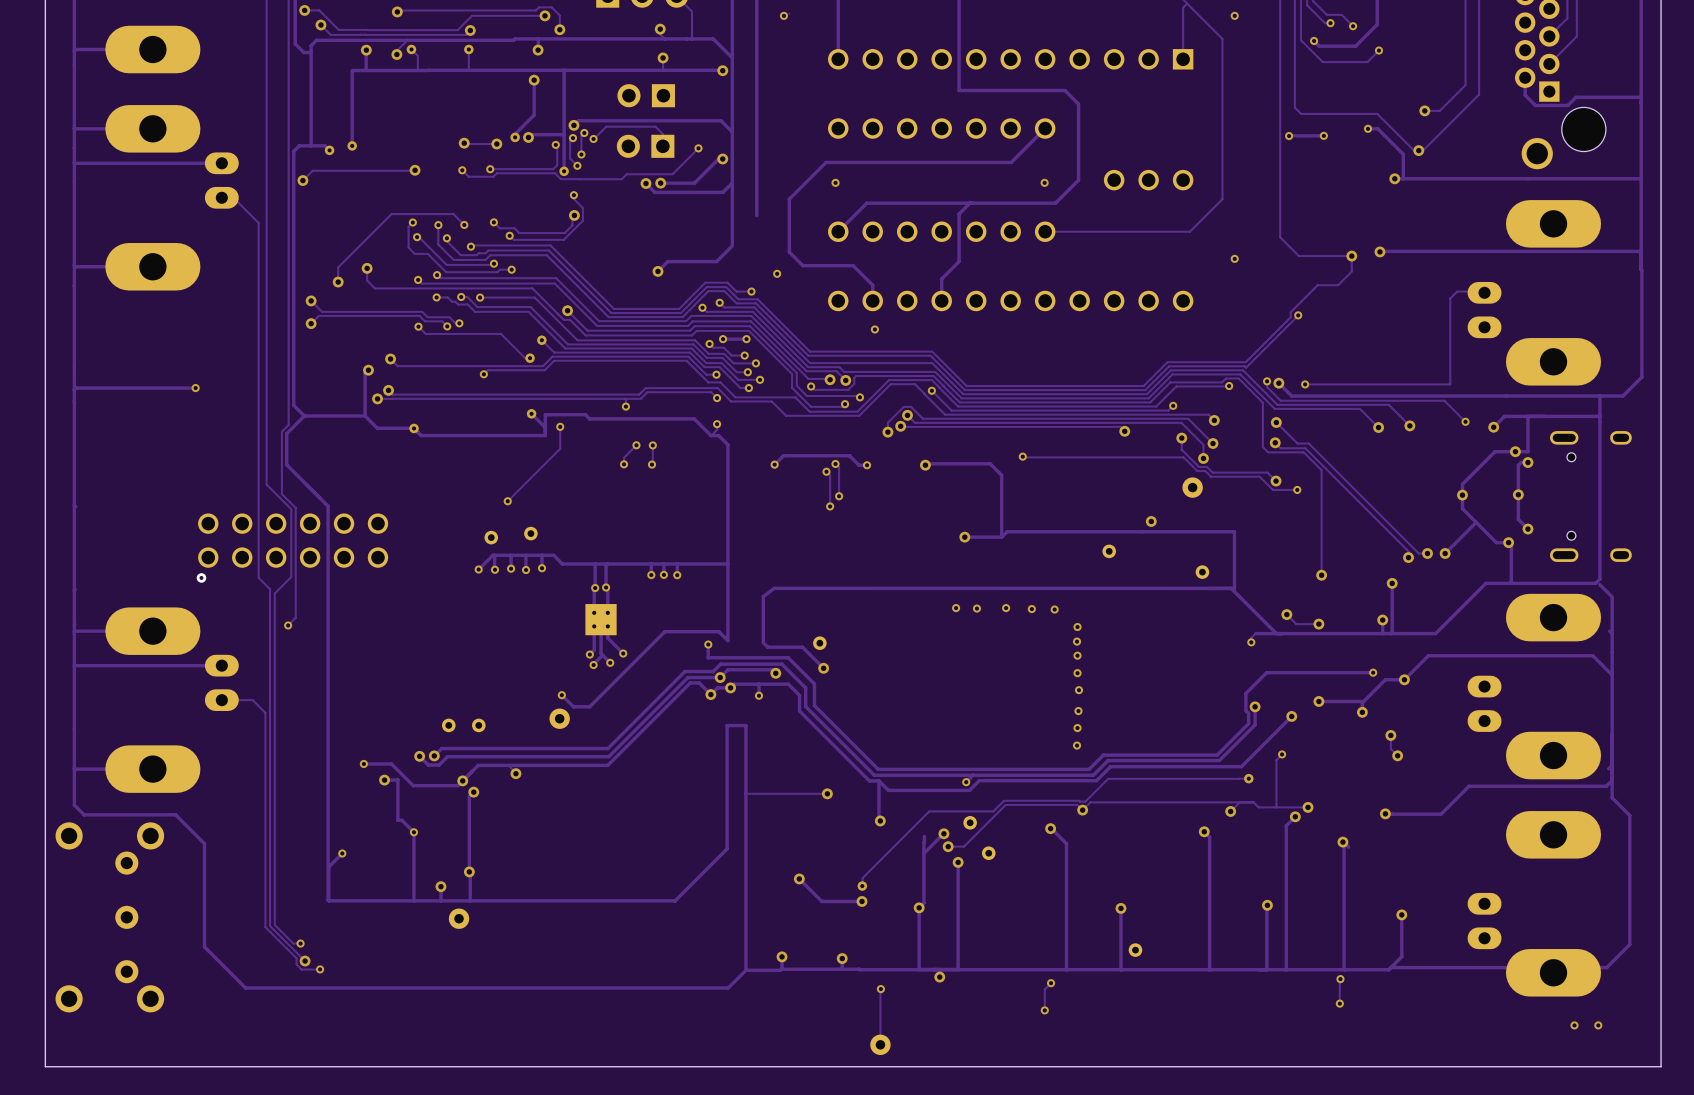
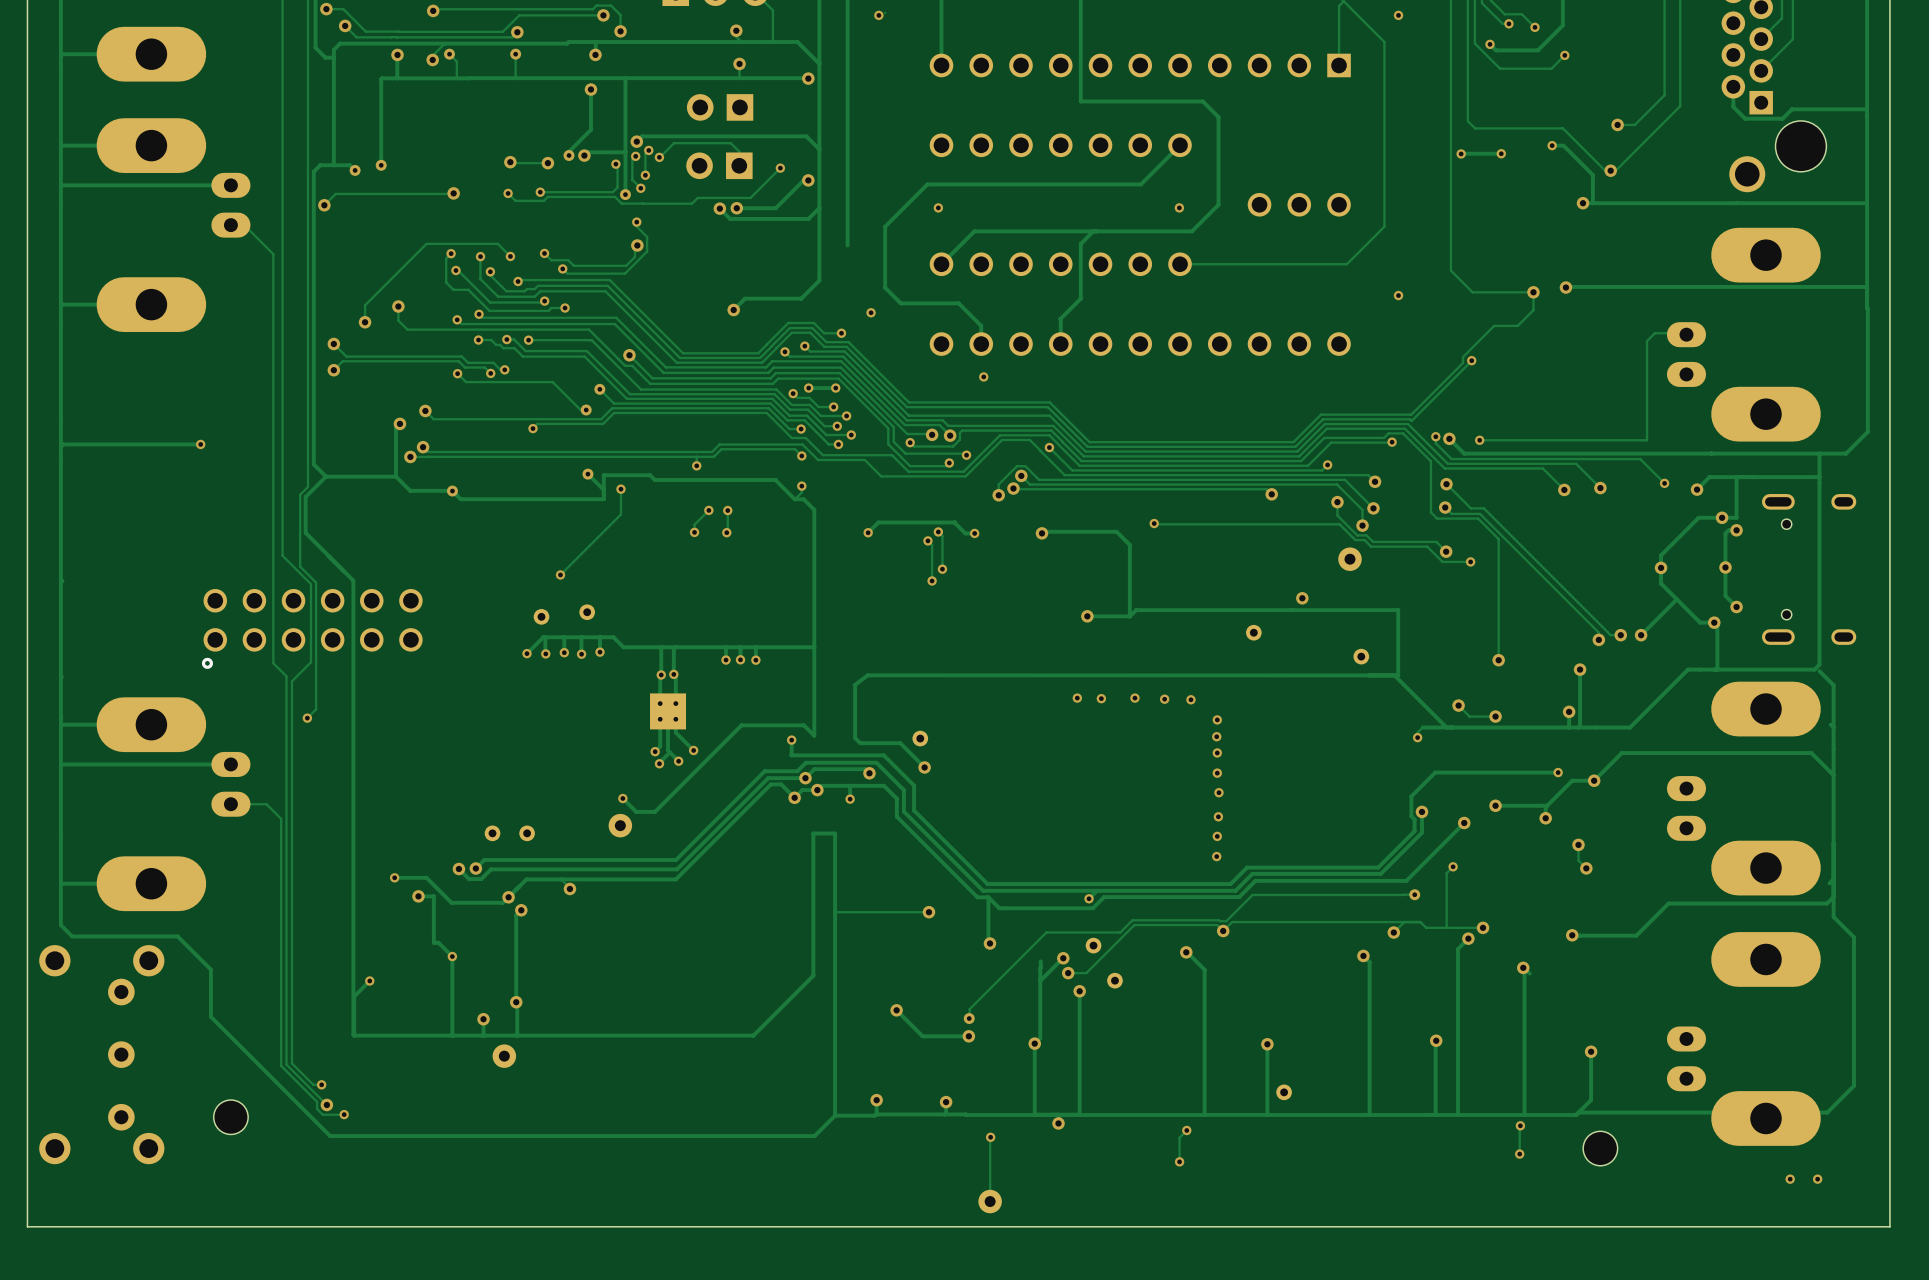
track: (204, 884) (204, 946) (245, 987) (307, 987) -> (210, 1016) (330, 1136)
part: none -> (230, 1117)
part: none -> (1600, 1148)

